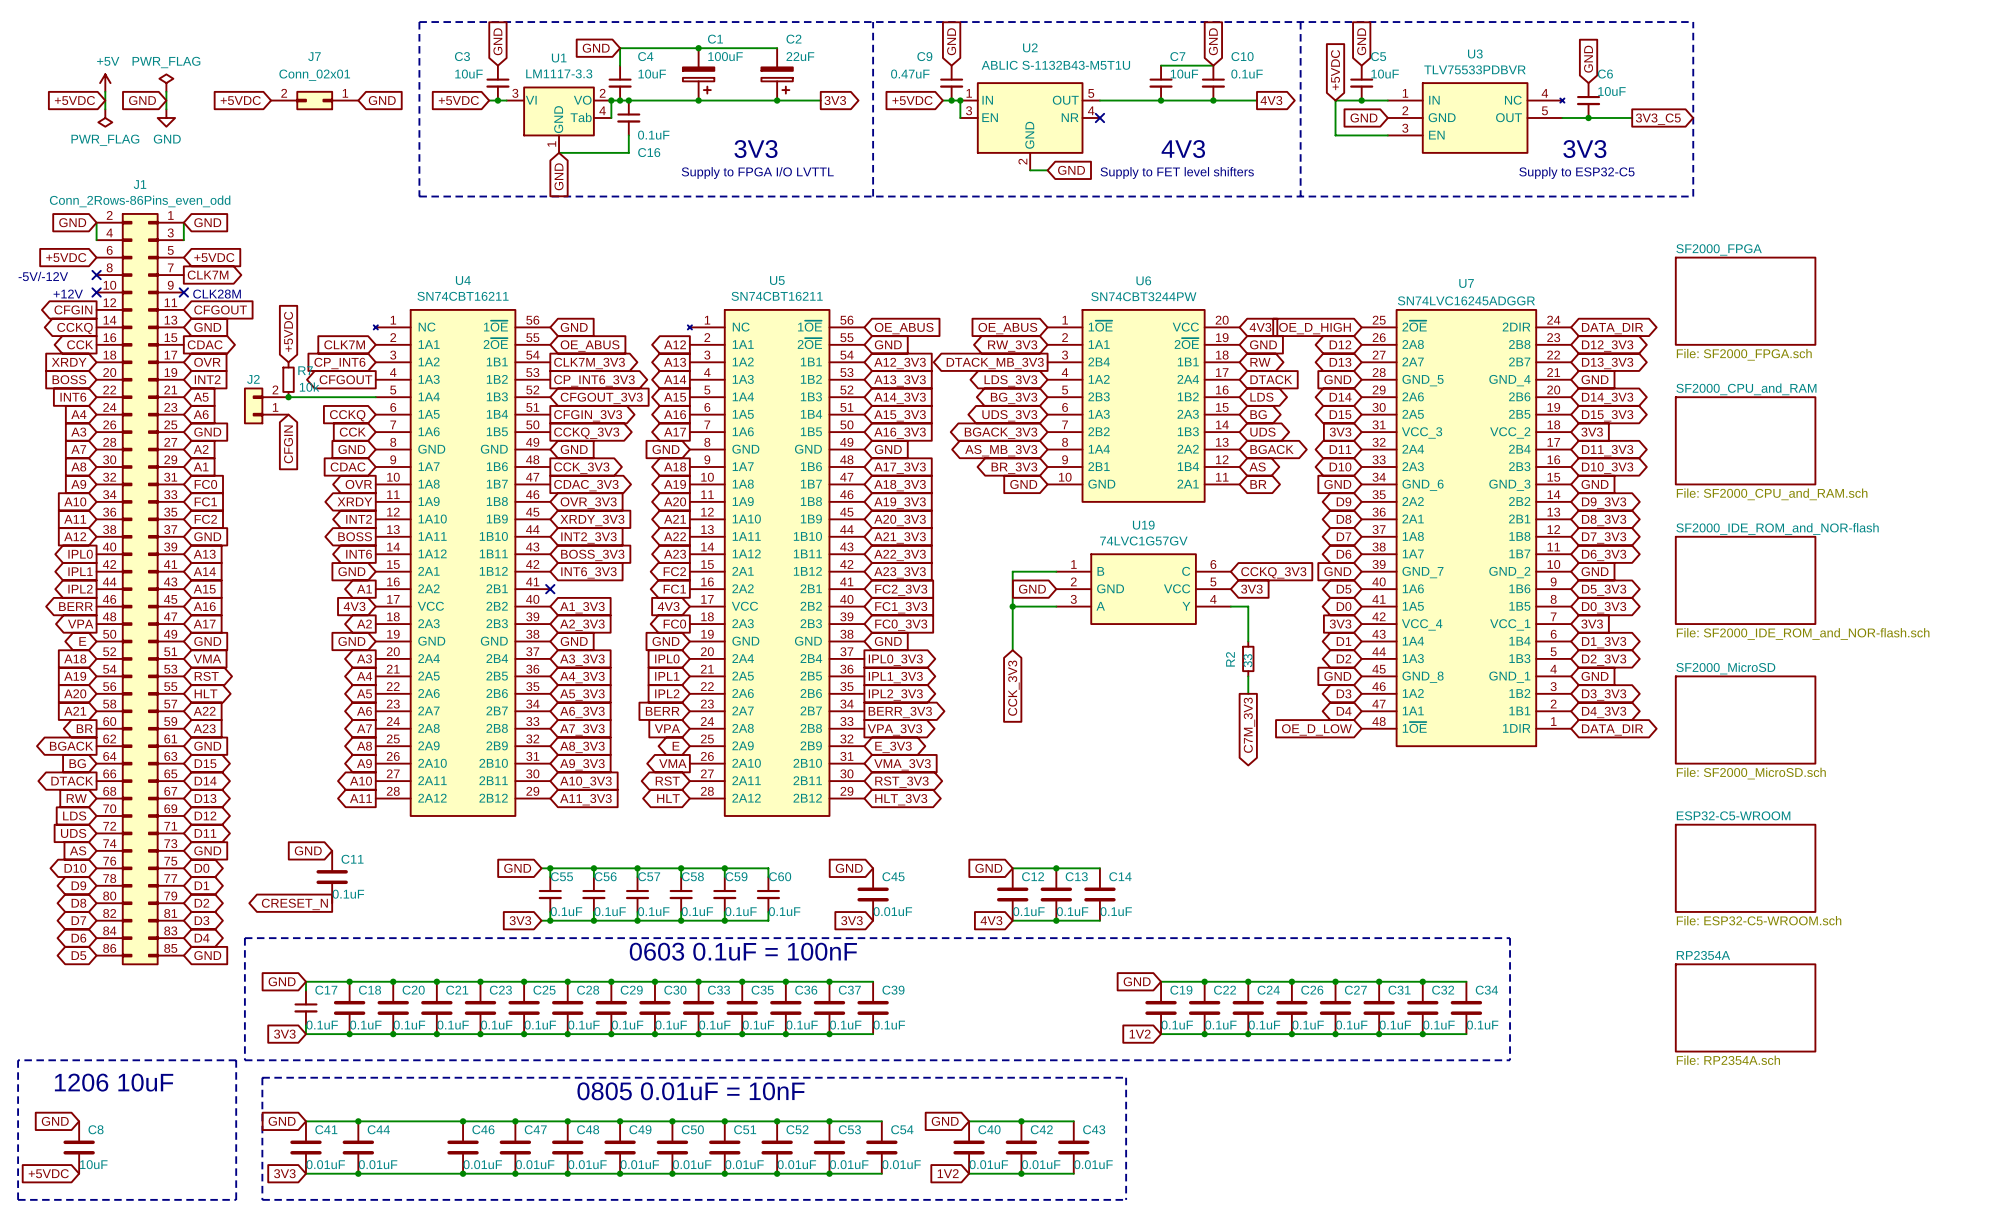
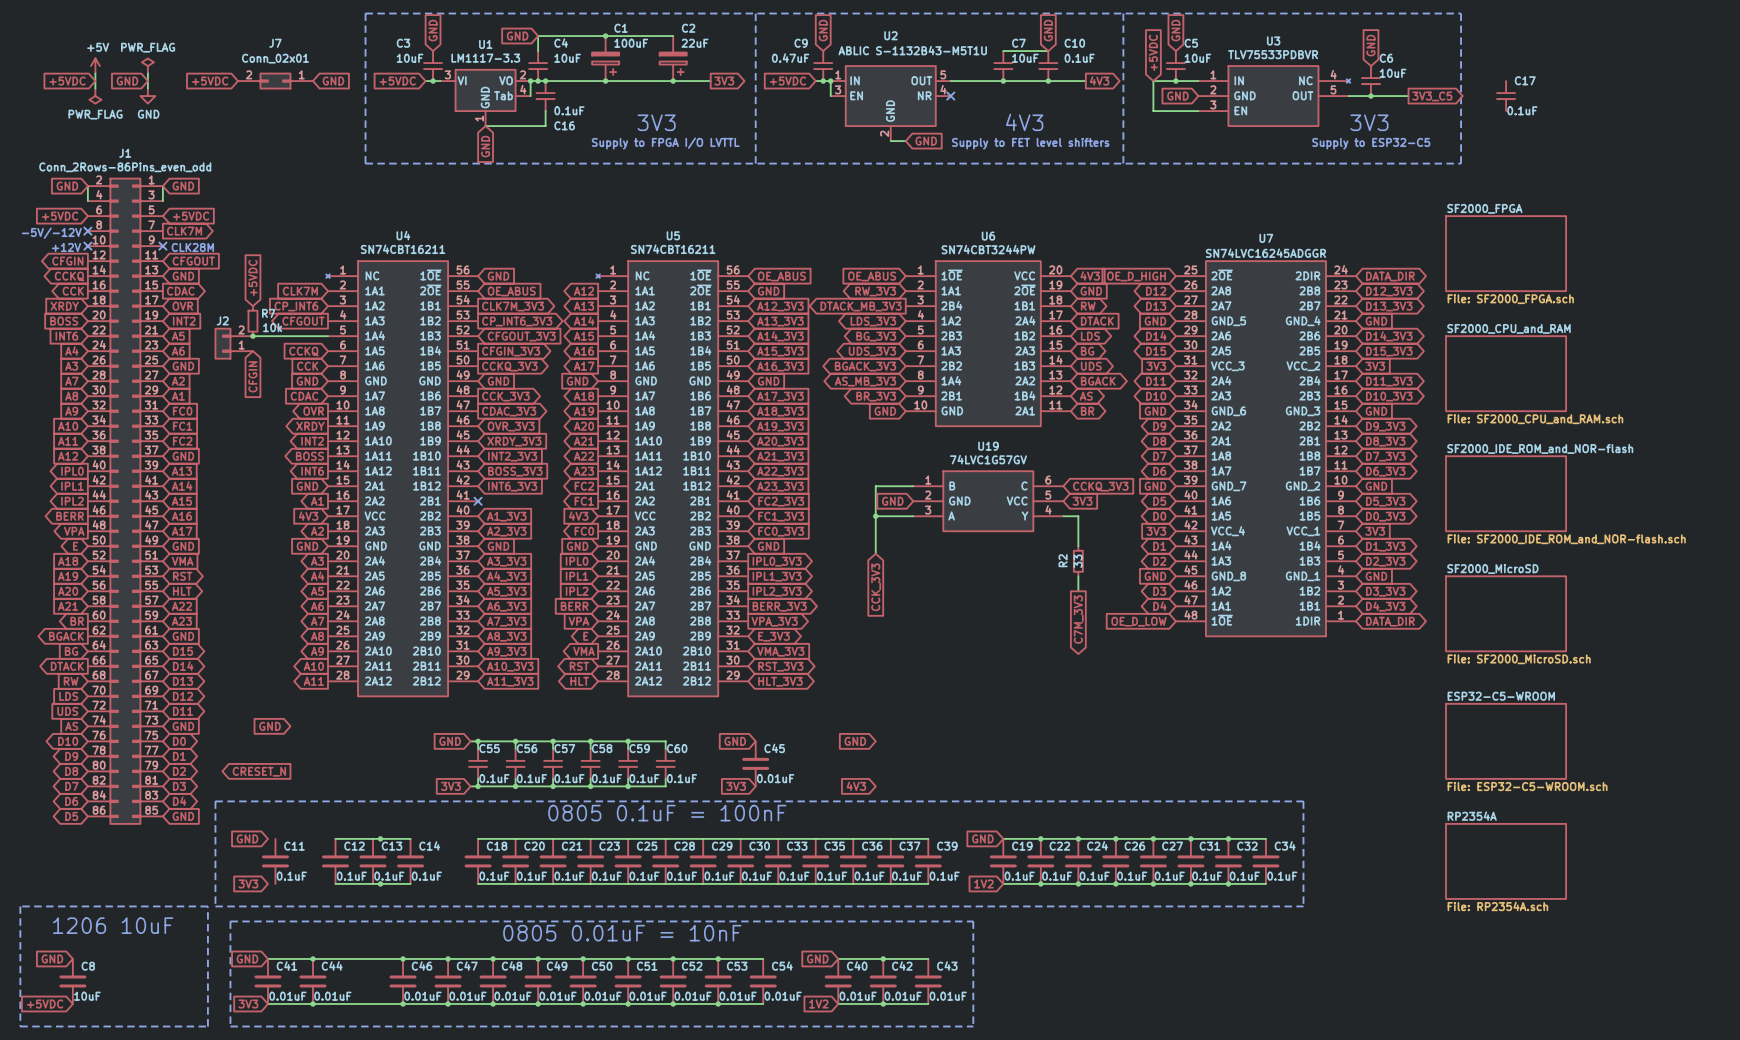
wire: (1012, 868) (1099, 868) -> none
junction: (1056, 868) -> none
C11 position: (332, 877) -> (275, 861)
C12 position: (1012, 894) -> (335, 861)
C13 position: (1056, 894) -> (373, 861)
C14 position: (1099, 894) -> (410, 861)
wire: (1012, 920) (1099, 920) -> none
junction: (1056, 920) -> none
text: 0603 0.1uF = 100nF (743, 951) -> 0805 0.1uF = 100nF (667, 813)
junction: (349, 981) -> none
wire: (384, 981) (305, 981) (305, 990) -> none
junction: (393, 981) -> none
wire: (471, 981) (550, 981) -> none
junction: (480, 981) -> none
junction: (524, 981) -> none
junction: (567, 981) -> none
junction: (611, 981) -> none
junction: (654, 981) -> none
junction: (698, 981) -> none
junction: (742, 981) -> none
junction: (785, 981) -> none
junction: (829, 981) -> none
wire: none -> (755, 838) (928, 838)
C17 position: (305, 1007) -> (1506, 96)
C18 position: (349, 1007) -> (478, 861)
C20 position: (393, 1007) -> (515, 861)
C21 position: (436, 1007) -> (553, 861)
C23 position: (480, 1007) -> (590, 861)
C25 position: (524, 1007) -> (628, 861)
C28 position: (567, 1007) -> (665, 861)
C29 position: (611, 1007) -> (703, 861)
C30 position: (654, 1007) -> (740, 861)
C33 position: (698, 1007) -> (778, 861)
C35 position: (742, 1007) -> (815, 861)
C36 position: (785, 1007) -> (853, 861)
C37 position: (829, 1007) -> (890, 861)
C39 position: (873, 1007) -> (928, 861)
wire: (305, 1025) (305, 1034) (384, 1034) -> none
junction: (349, 1034) -> none
junction: (393, 1034) -> none
wire: (471, 1034) (550, 1034) -> none
junction: (480, 1034) -> none
junction: (524, 1034) -> none
junction: (567, 1034) -> none
junction: (611, 1034) -> none
junction: (654, 1034) -> none
junction: (698, 1034) -> none
junction: (742, 1034) -> none
junction: (785, 1034) -> none
junction: (829, 1034) -> none
wire: none -> (755, 883) (928, 883)

